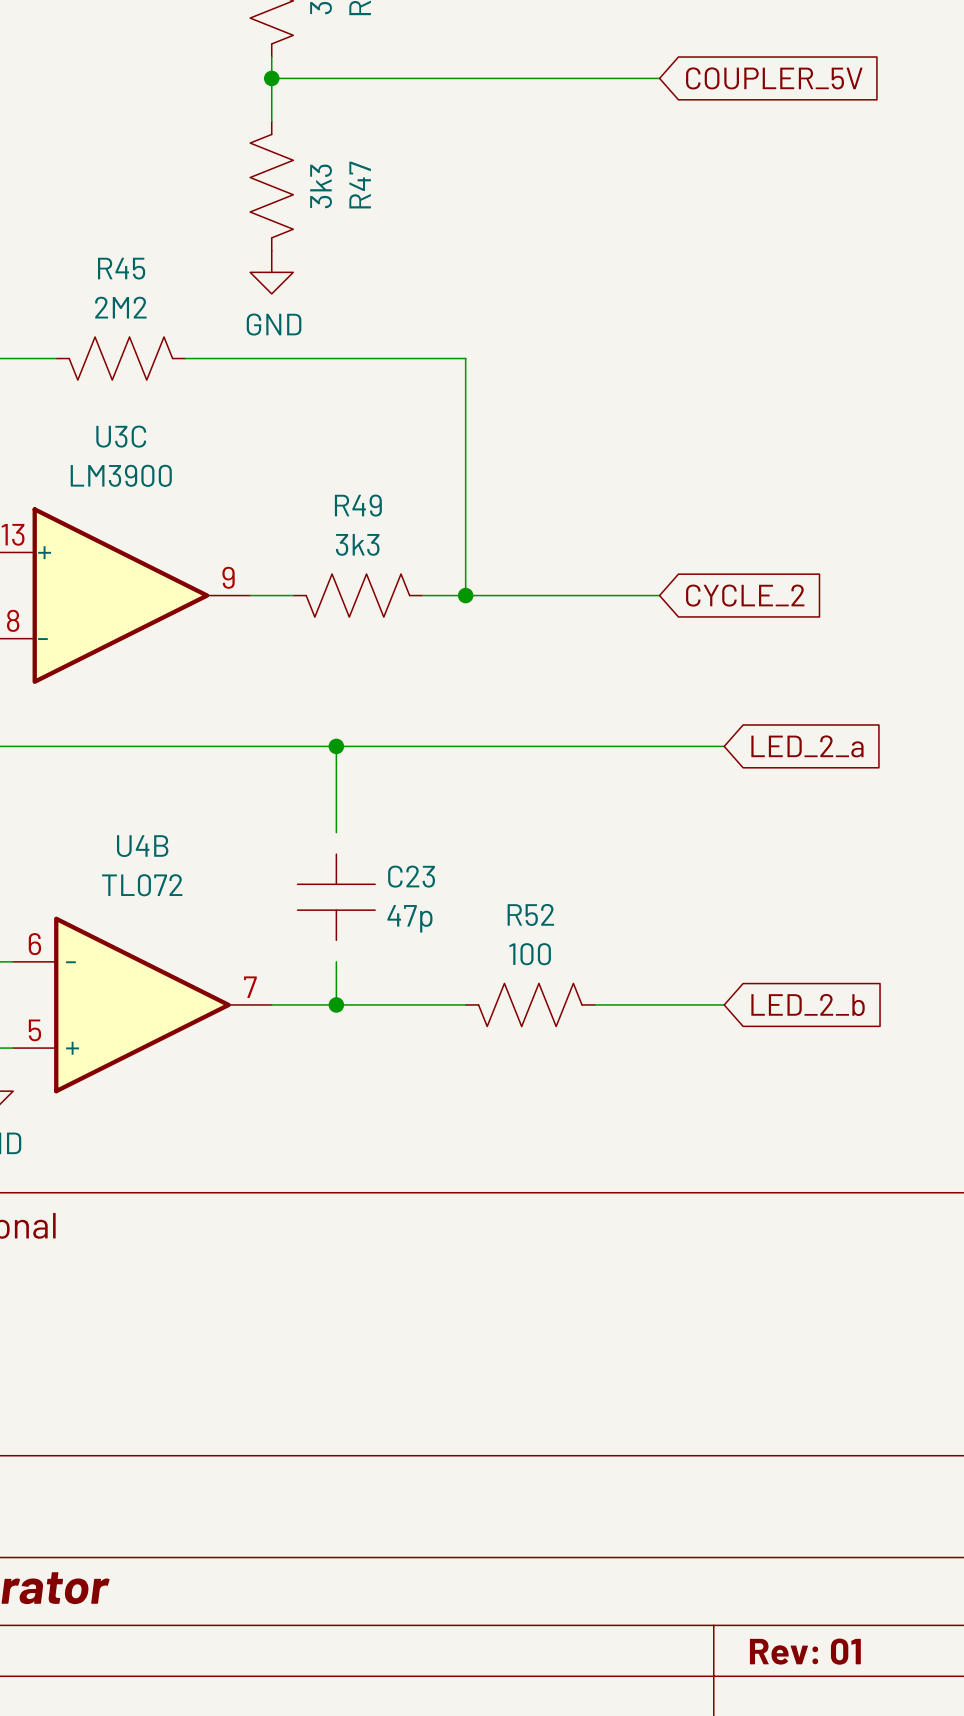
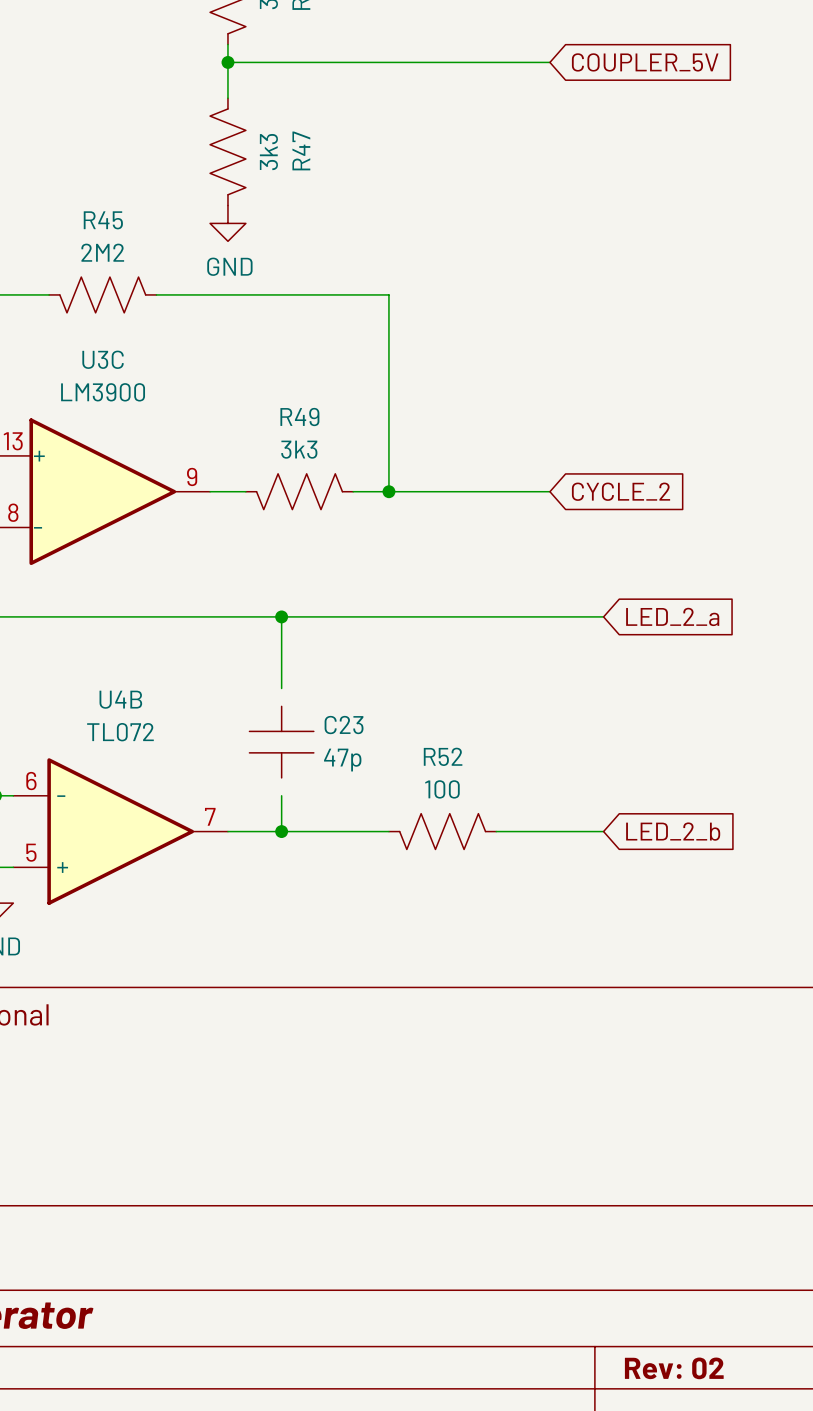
title block: Rev: 01 (805, 1651) -> Rev: 02 (674, 1368)

